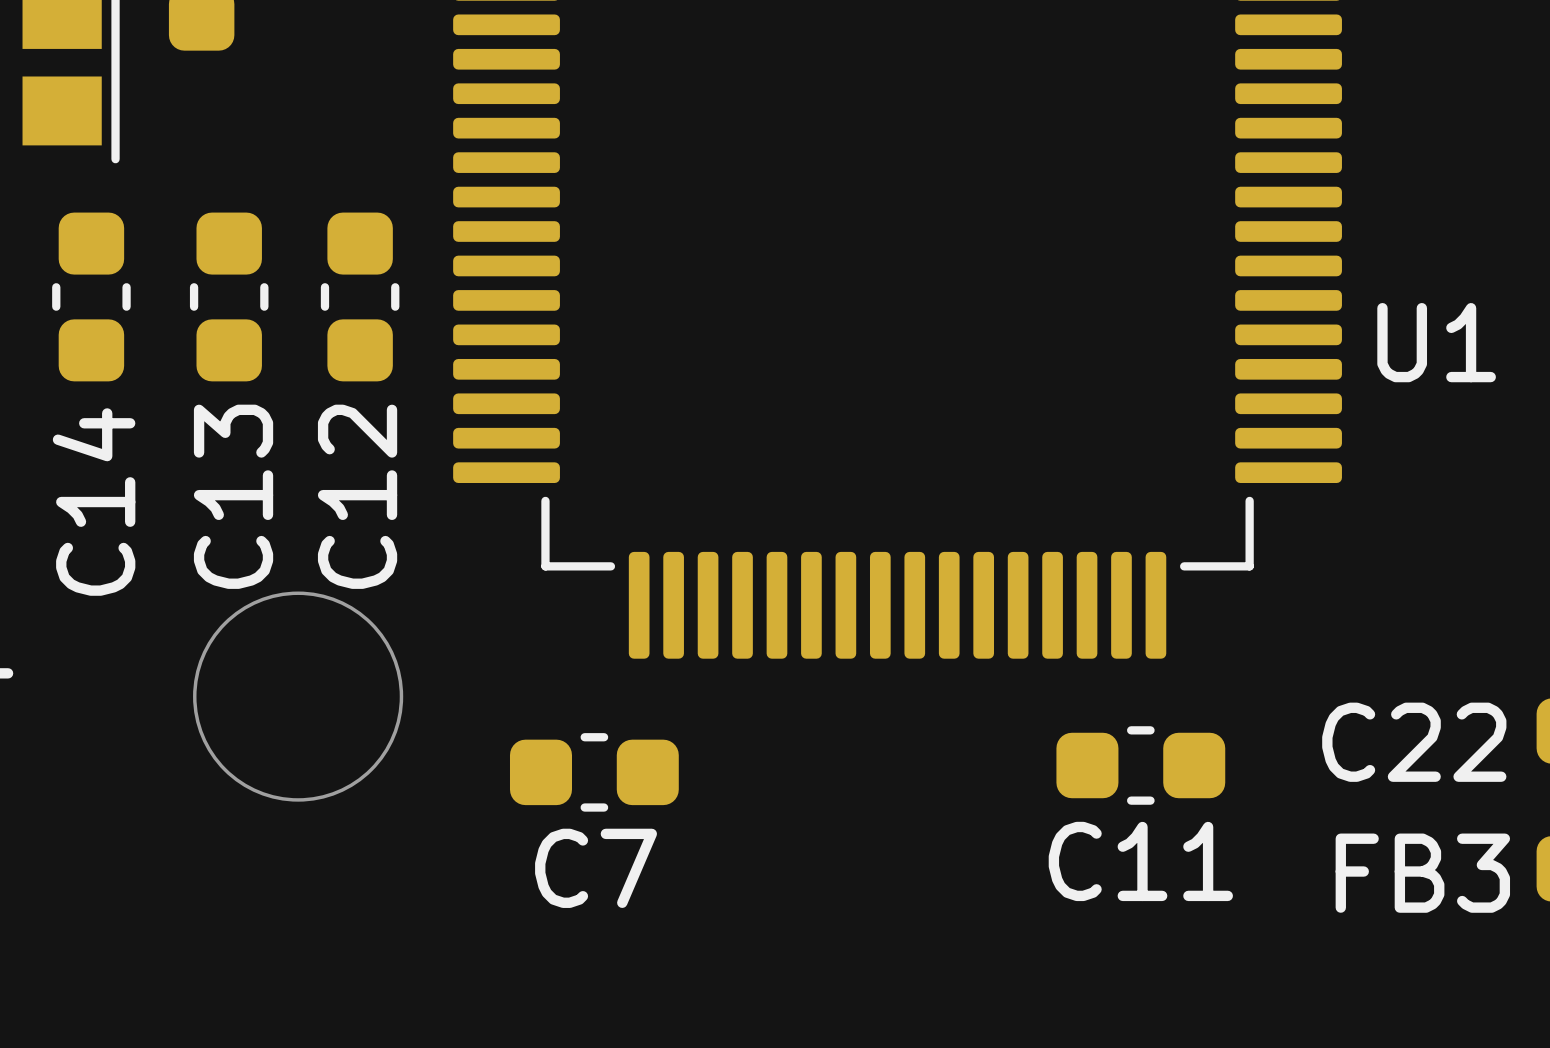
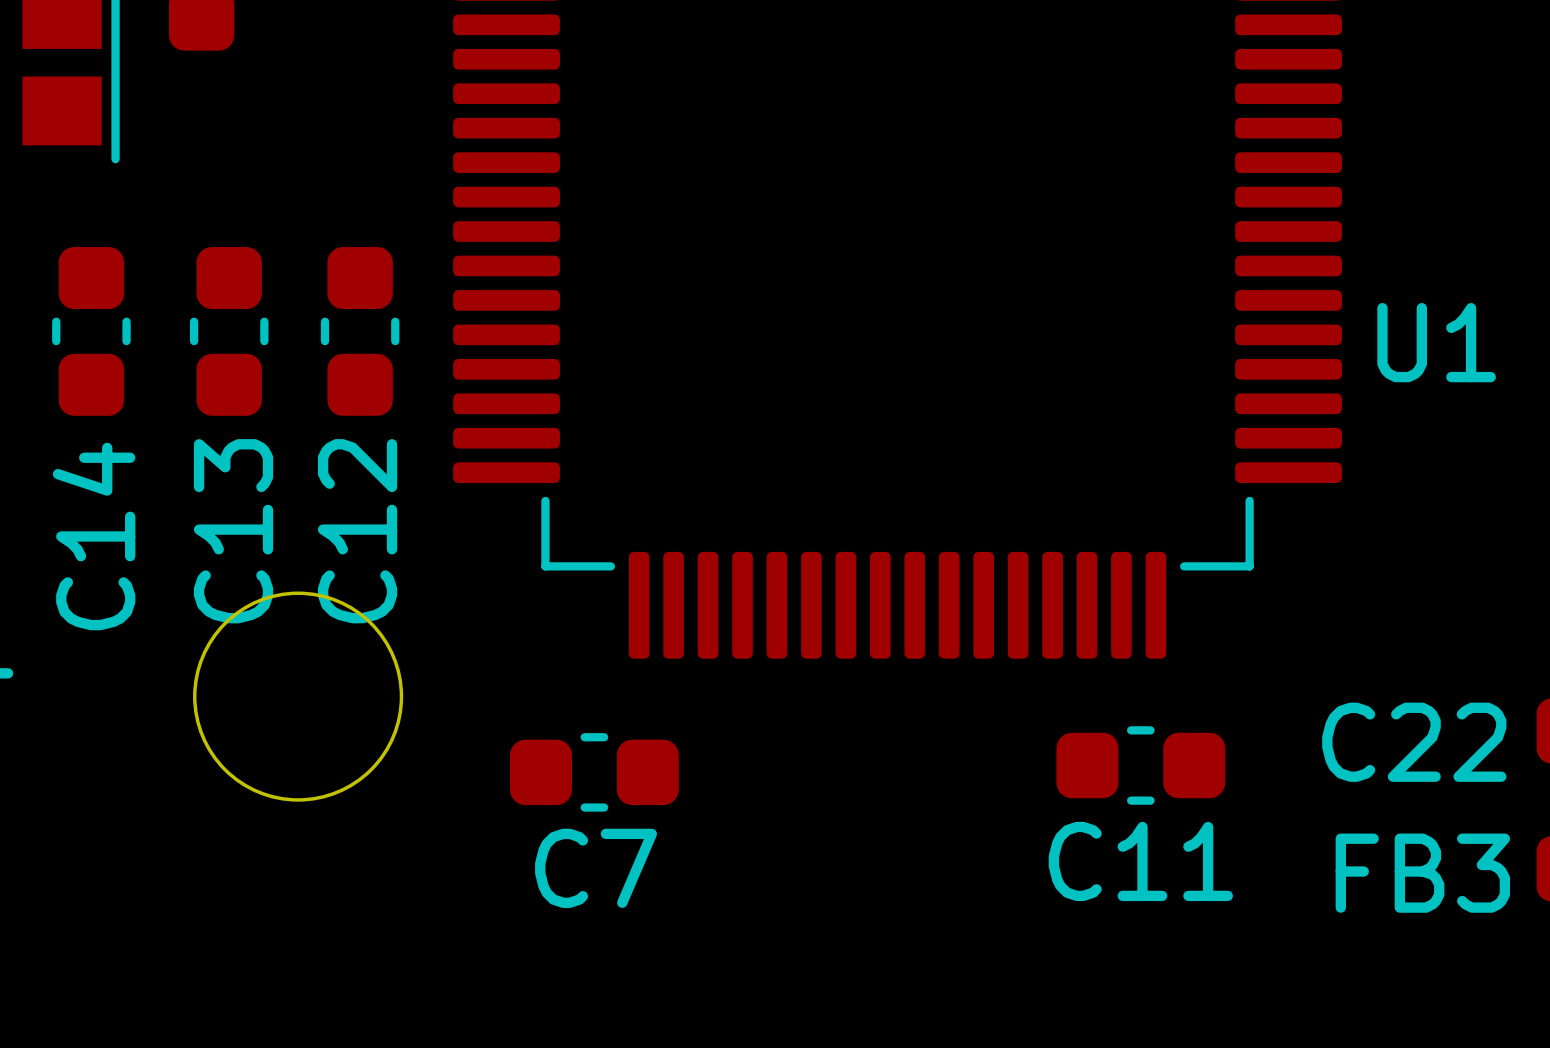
C14 position: (91, 296) -> (91, 331)
C13 position: (229, 296) -> (229, 331)
C12 position: (360, 296) -> (360, 331)

